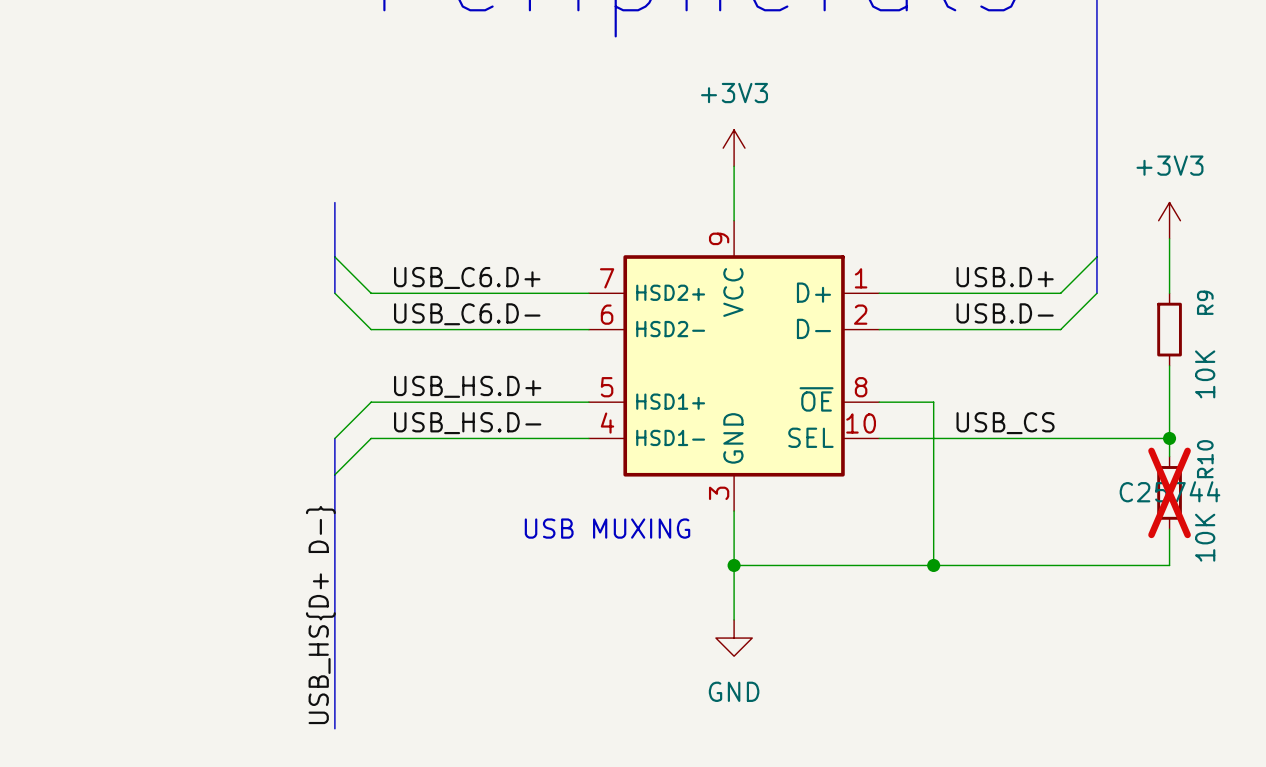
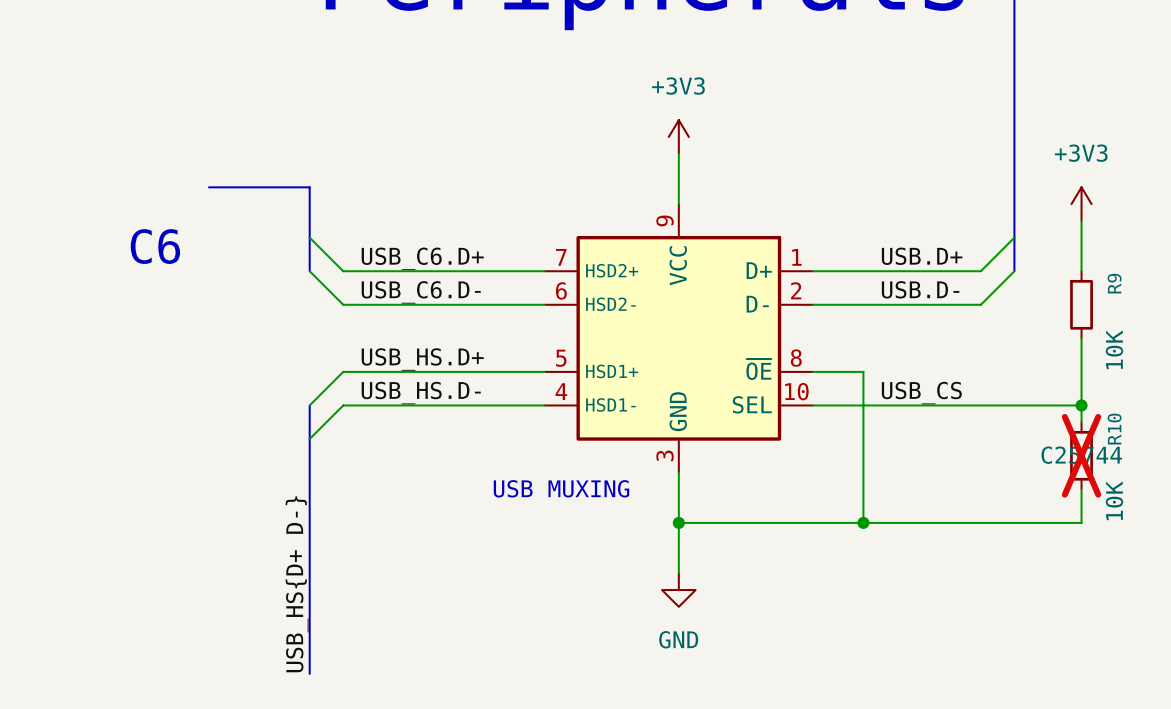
bus: none -> (209, 187) (309, 187)
text: none -> C6 (155, 246)

